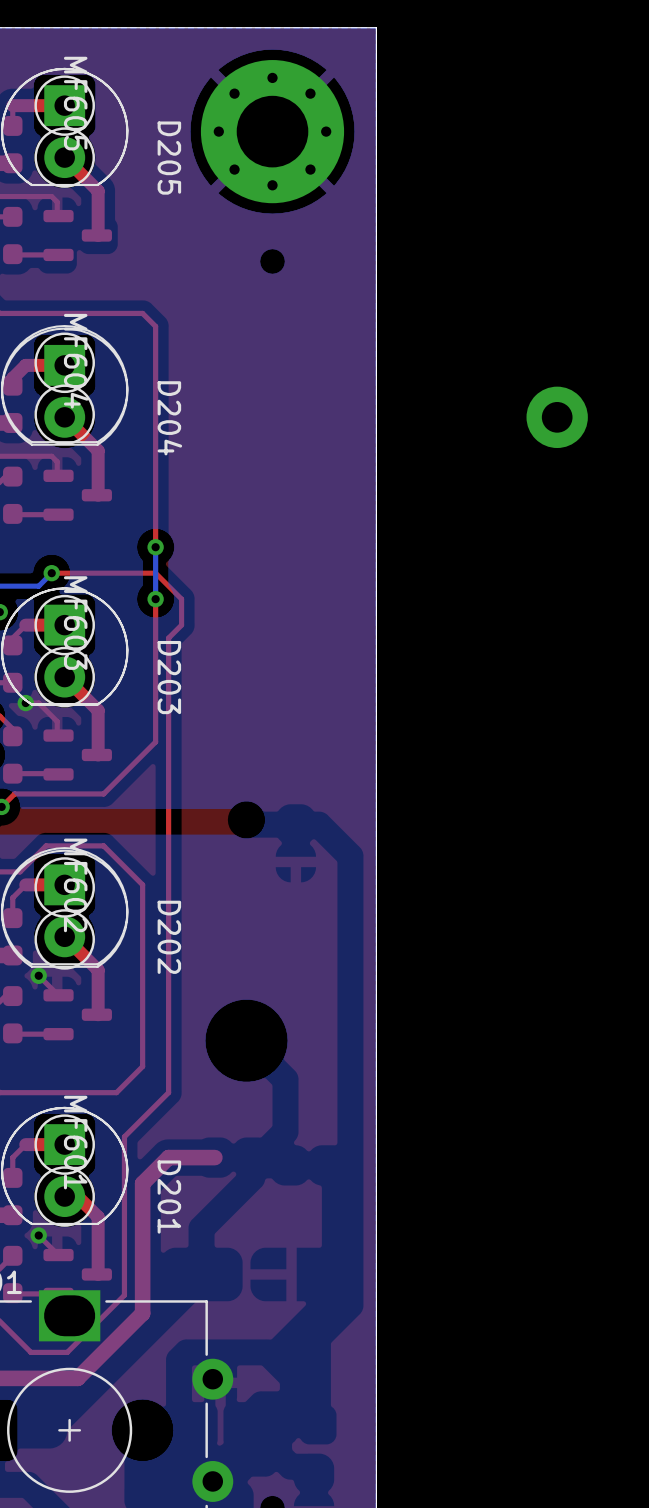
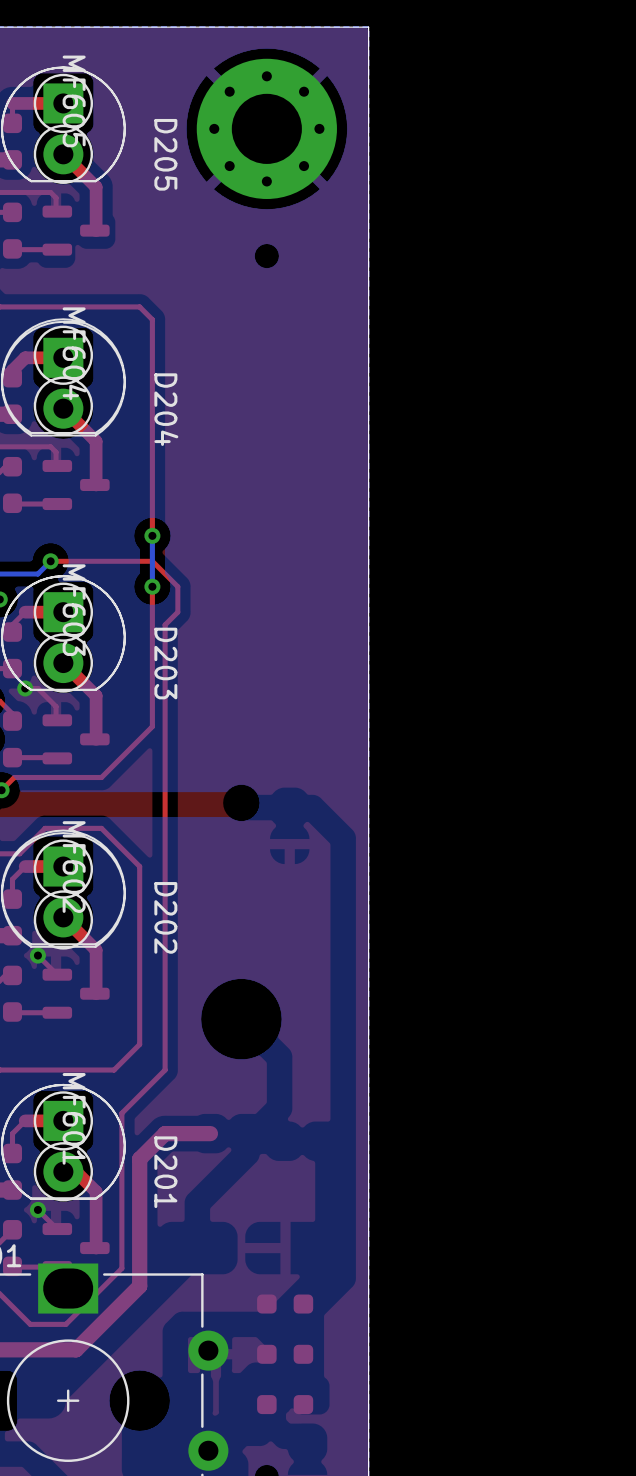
part: (557, 417) -> none
part: none -> (285, 1304)
part: none -> (285, 1354)
part: none -> (285, 1404)

